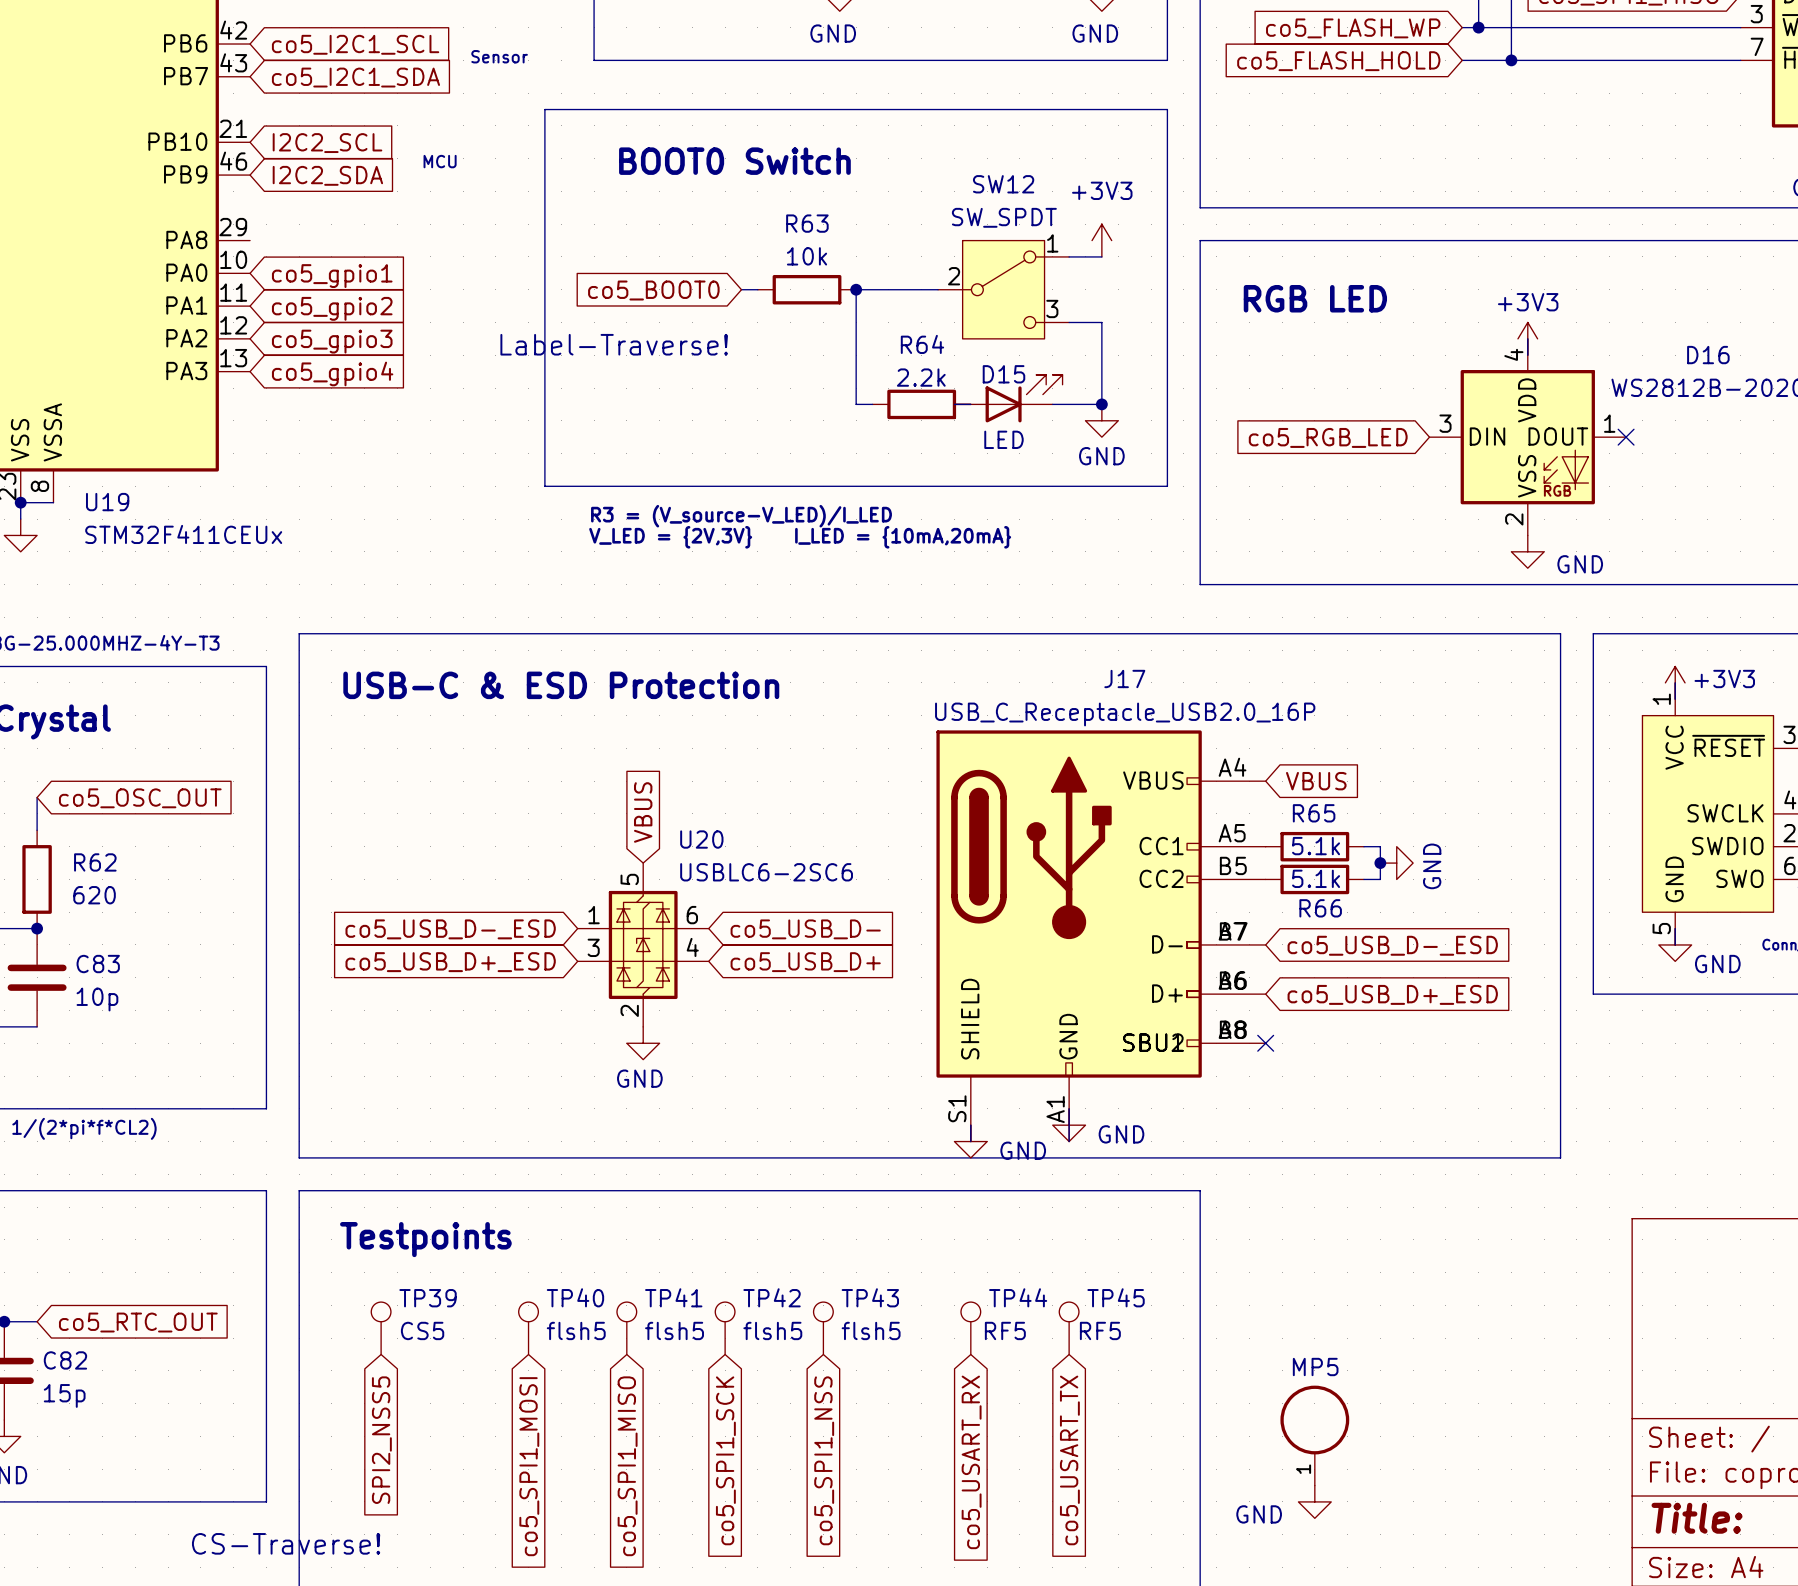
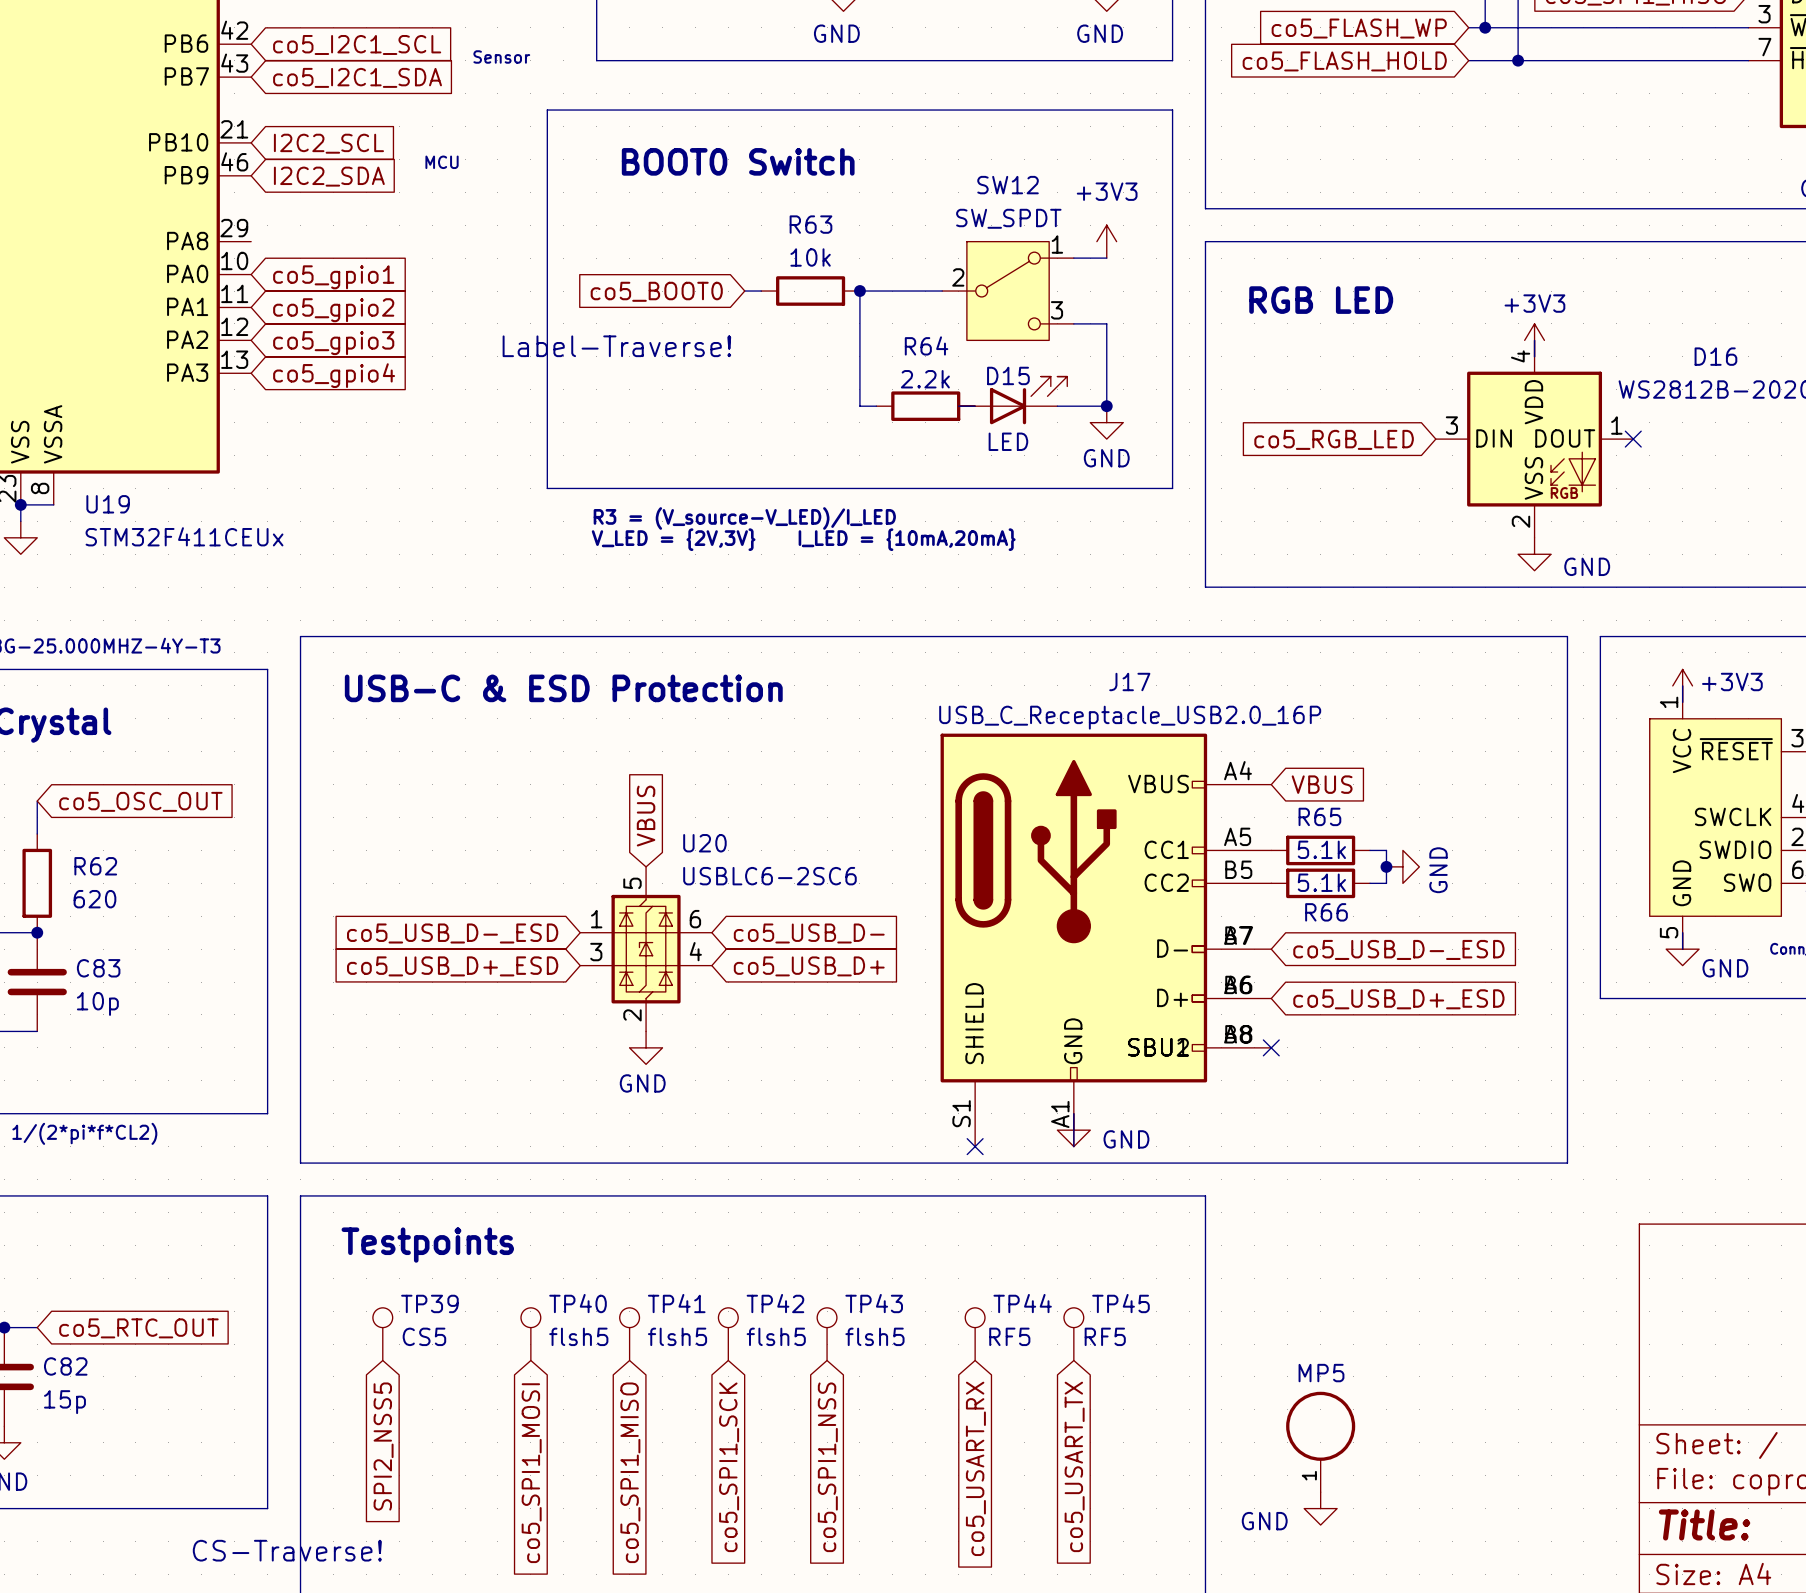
power symbol: GND (970, 1141) -> none
no-connect mark: none -> (975, 1146)

